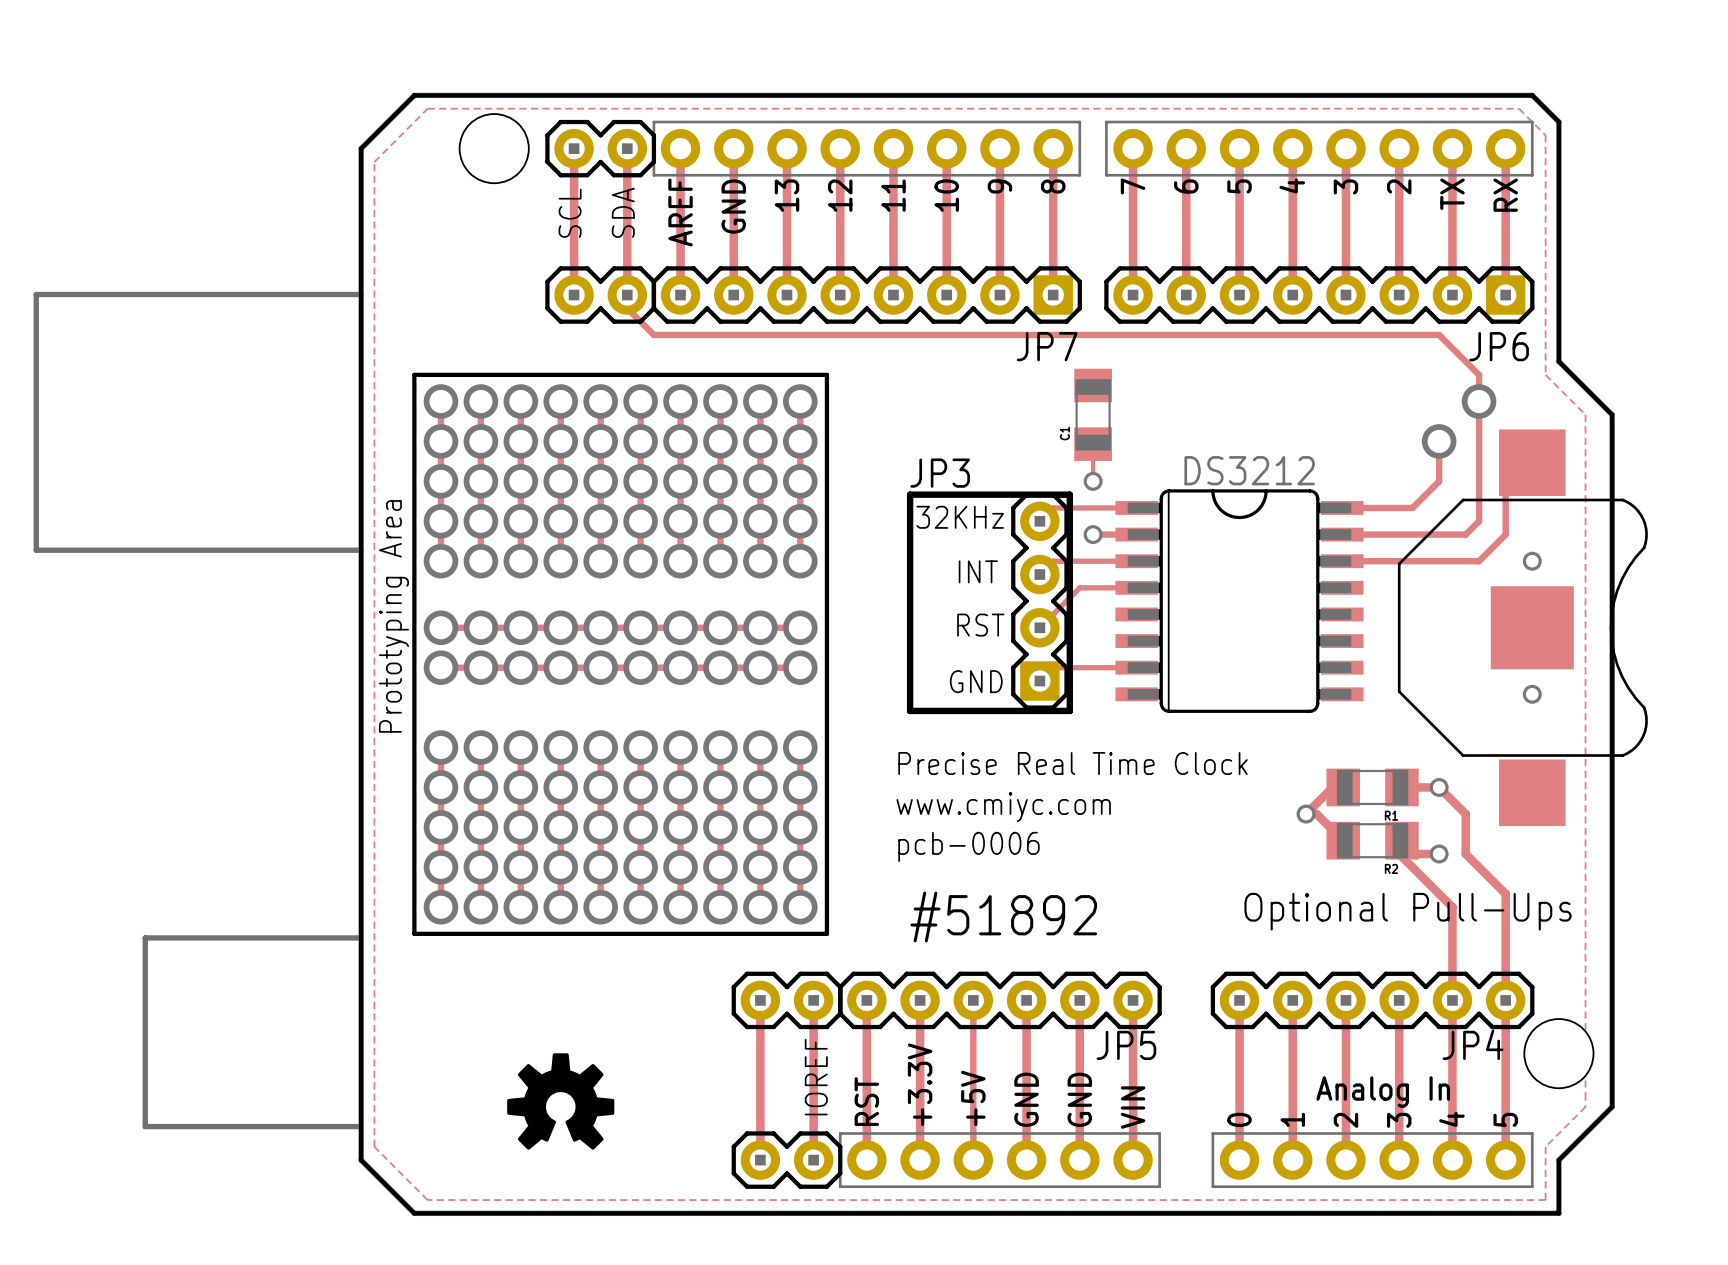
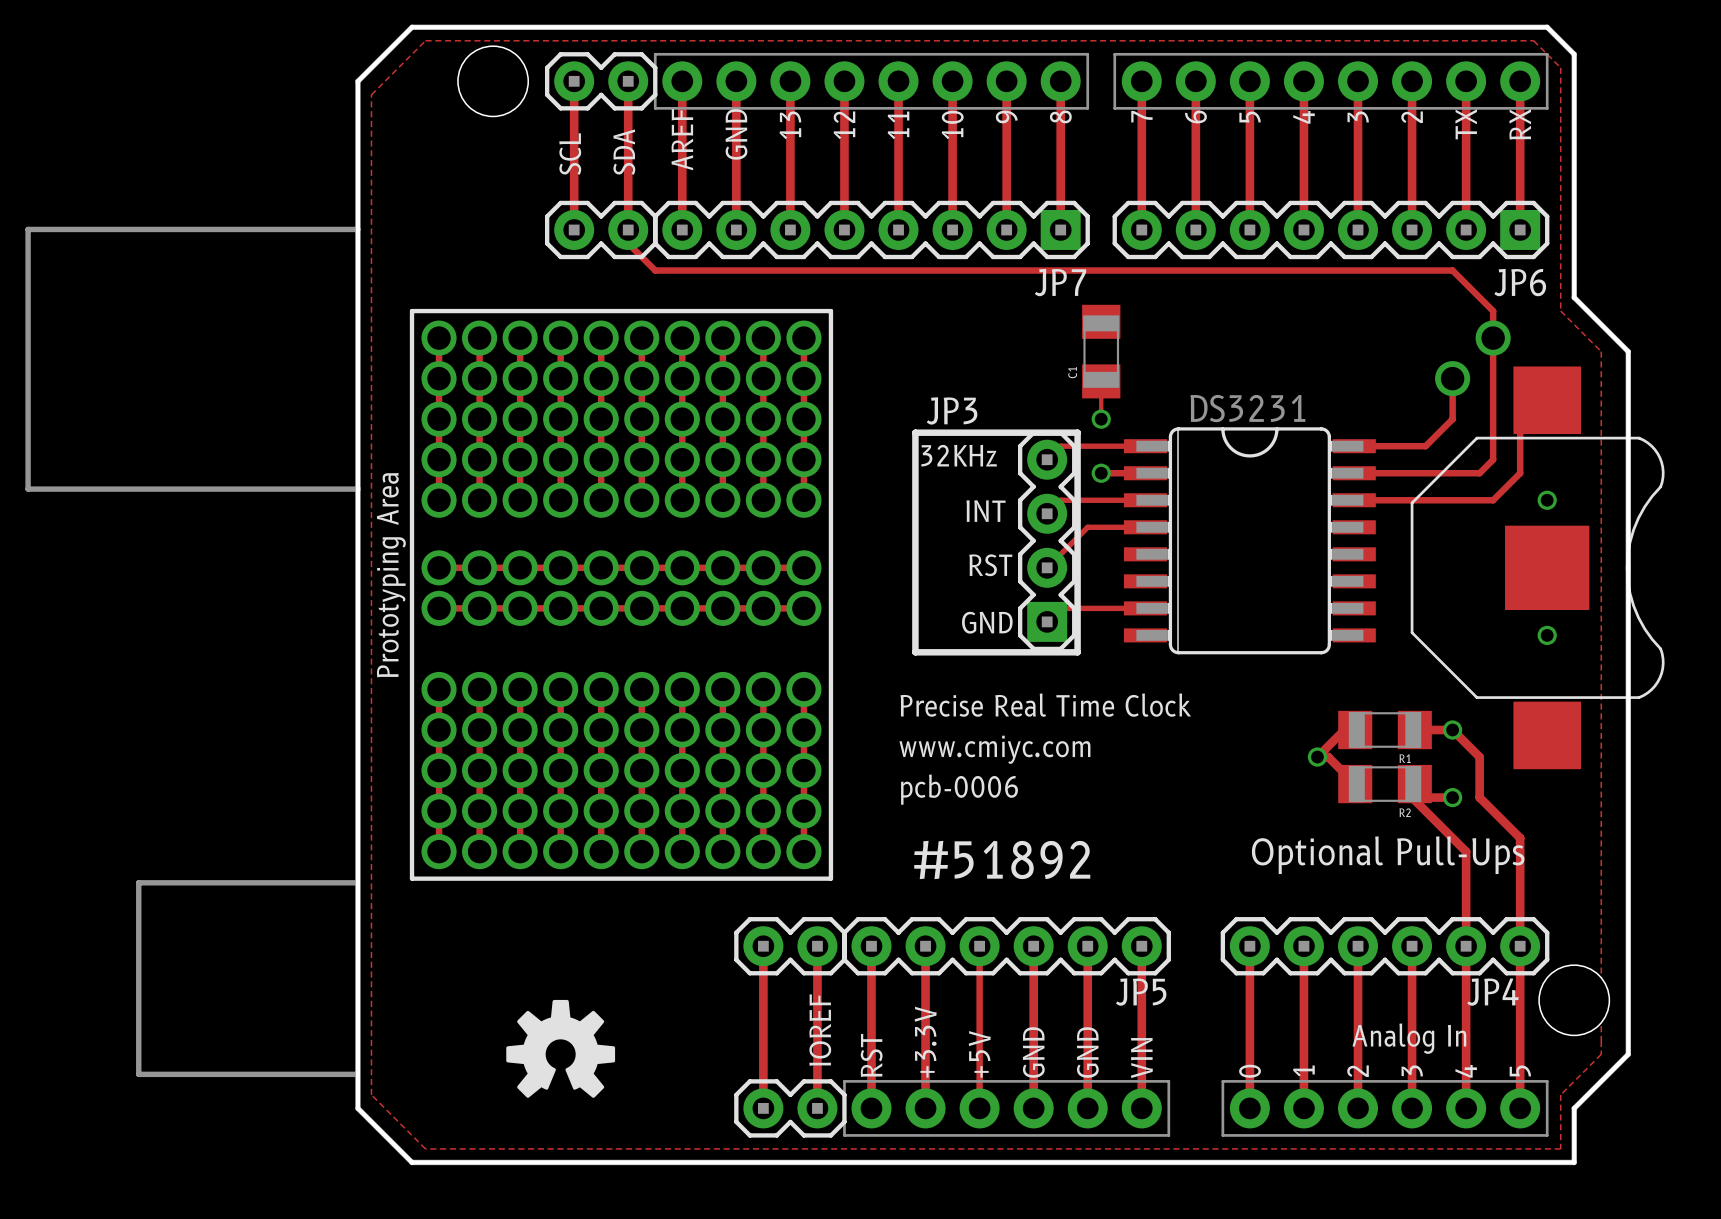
part value: DS3212 (1249, 470) -> DS3231 (1247, 408)

